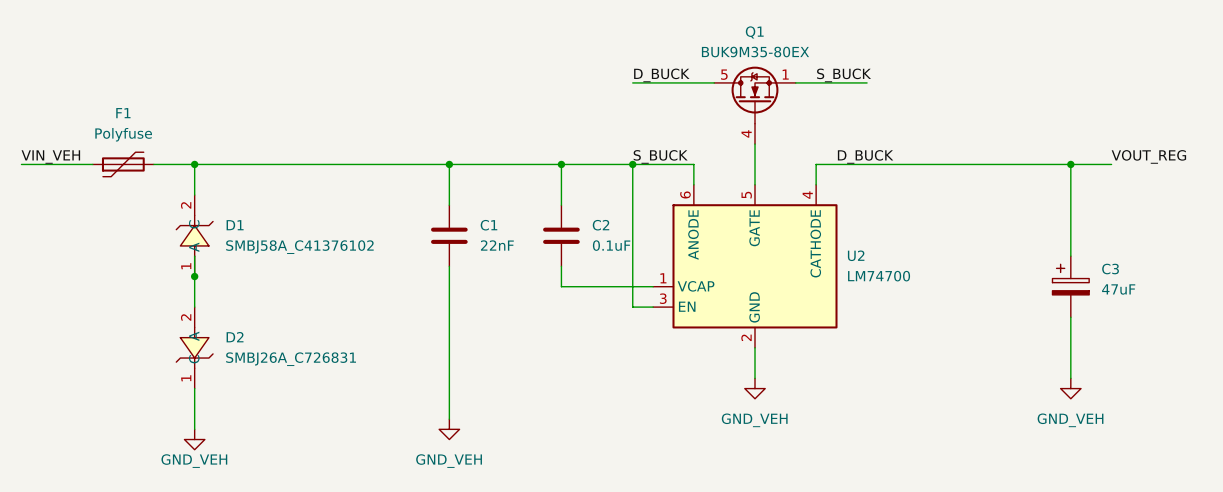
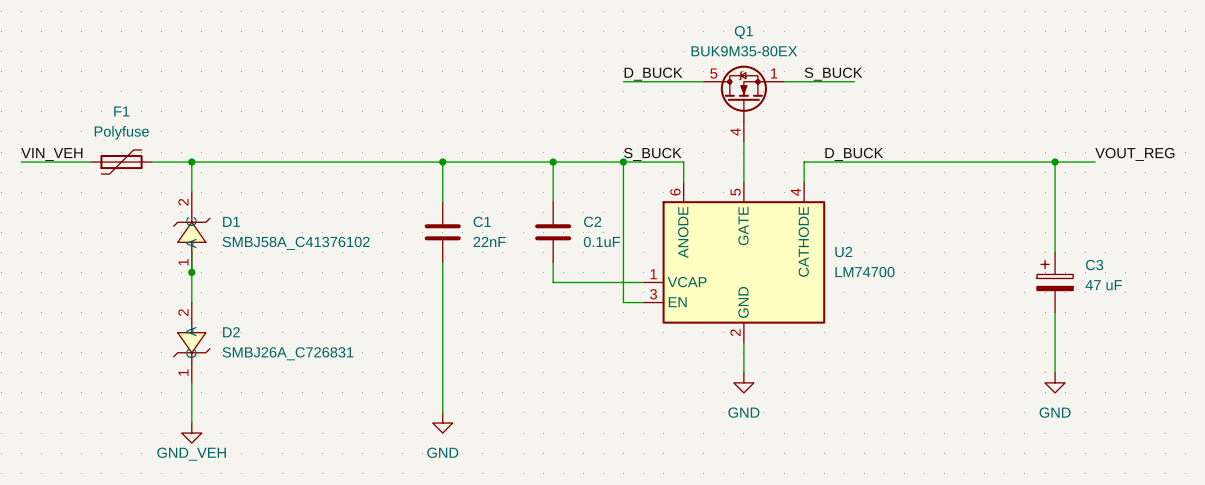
C3 value: 47uF (1118, 289) -> 47 uF (1103, 285)
power symbol: GND_VEH (755, 388) -> GND (743, 382)
power symbol: GND_VEH (1070, 388) -> GND (1055, 382)
power symbol: GND_VEH (449, 429) -> GND (442, 423)

